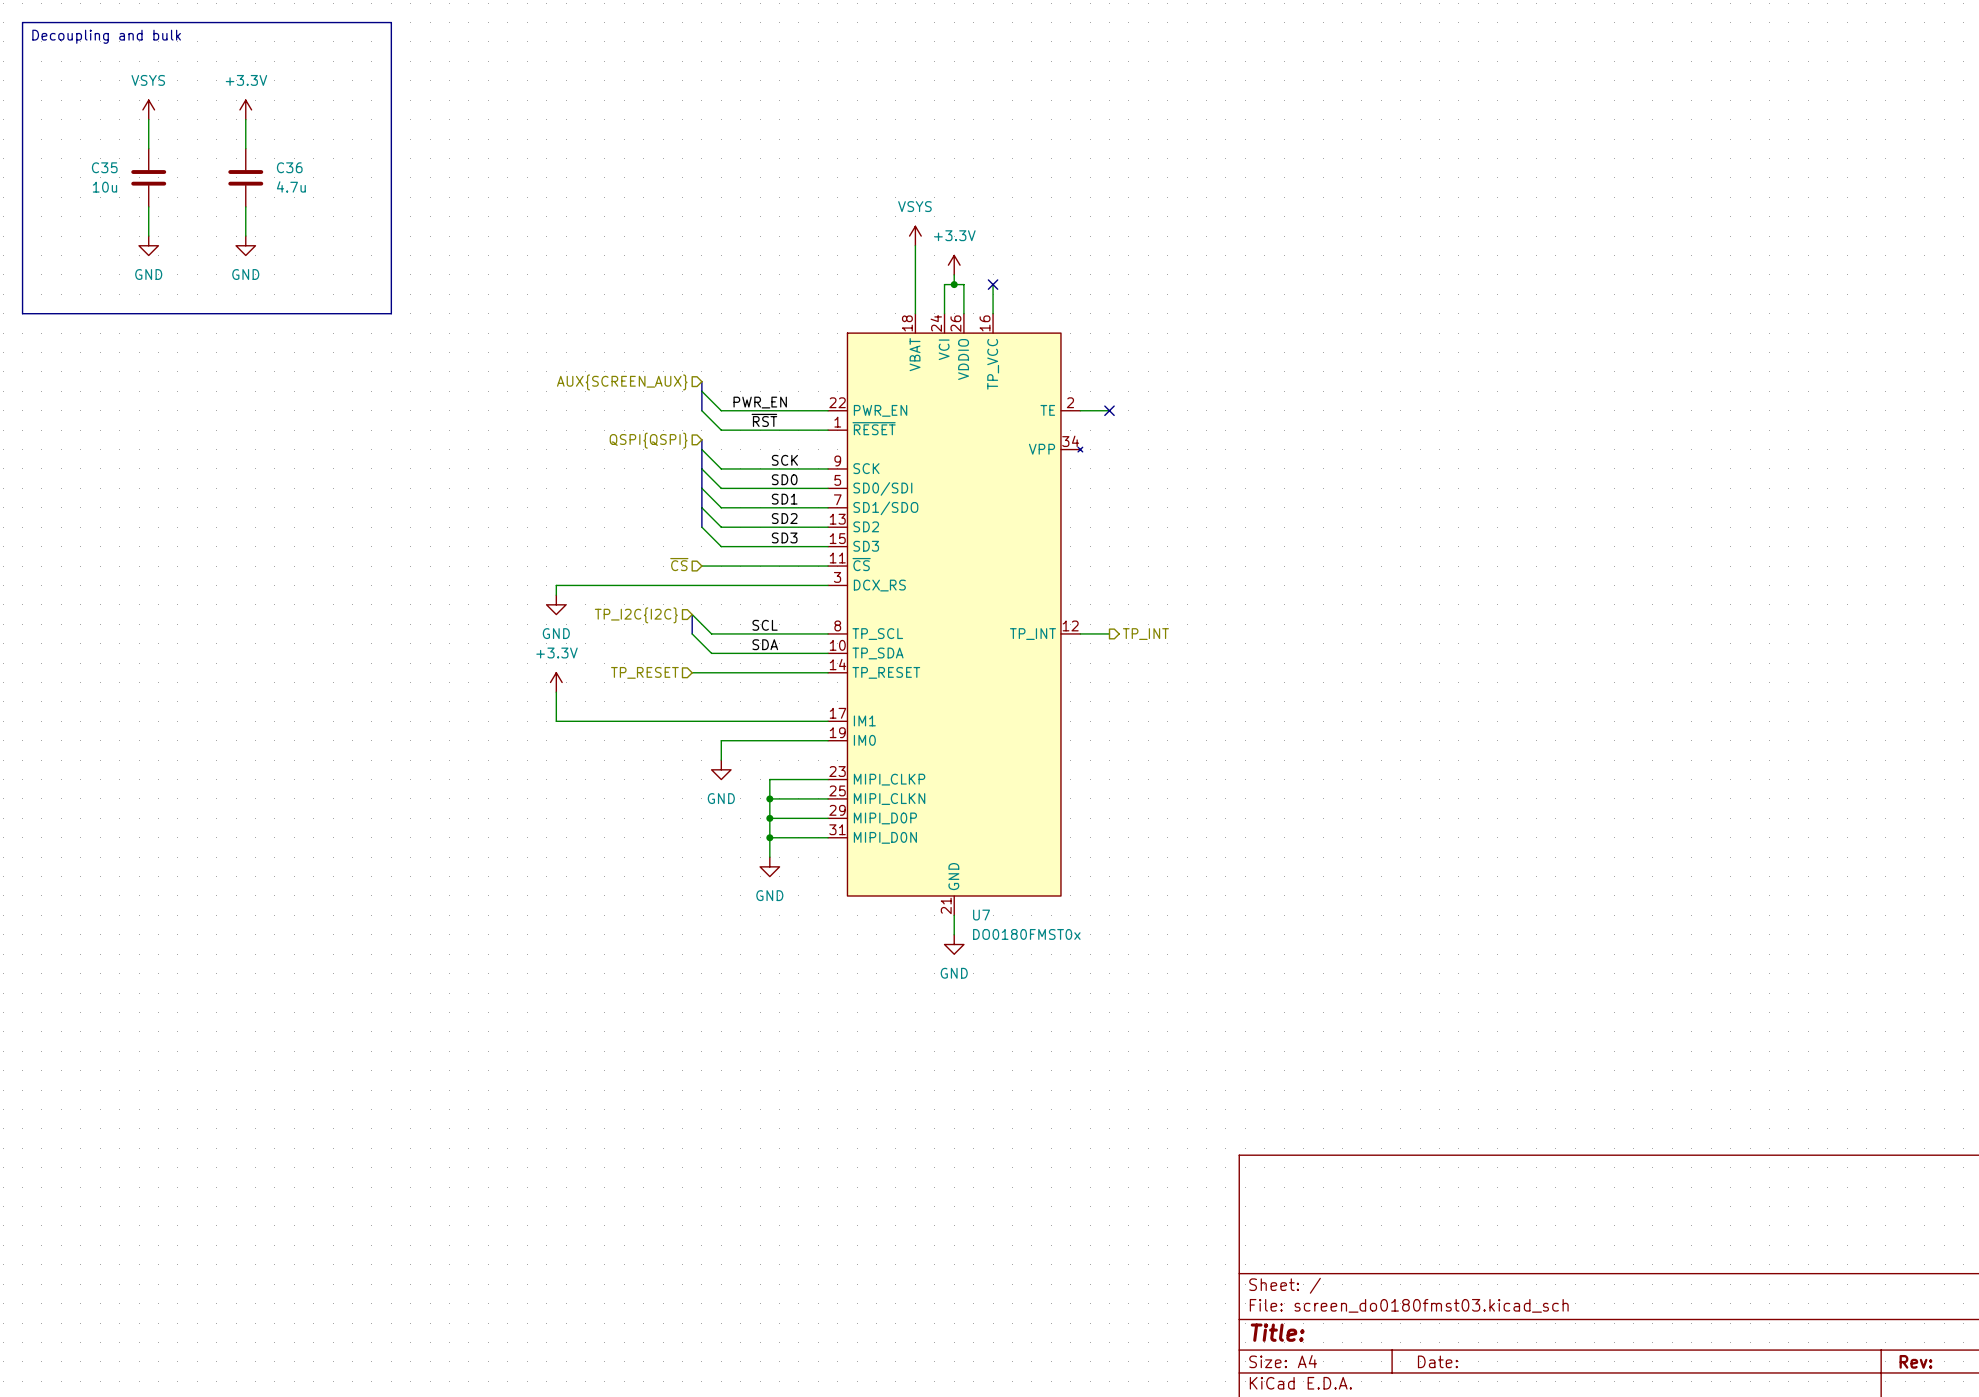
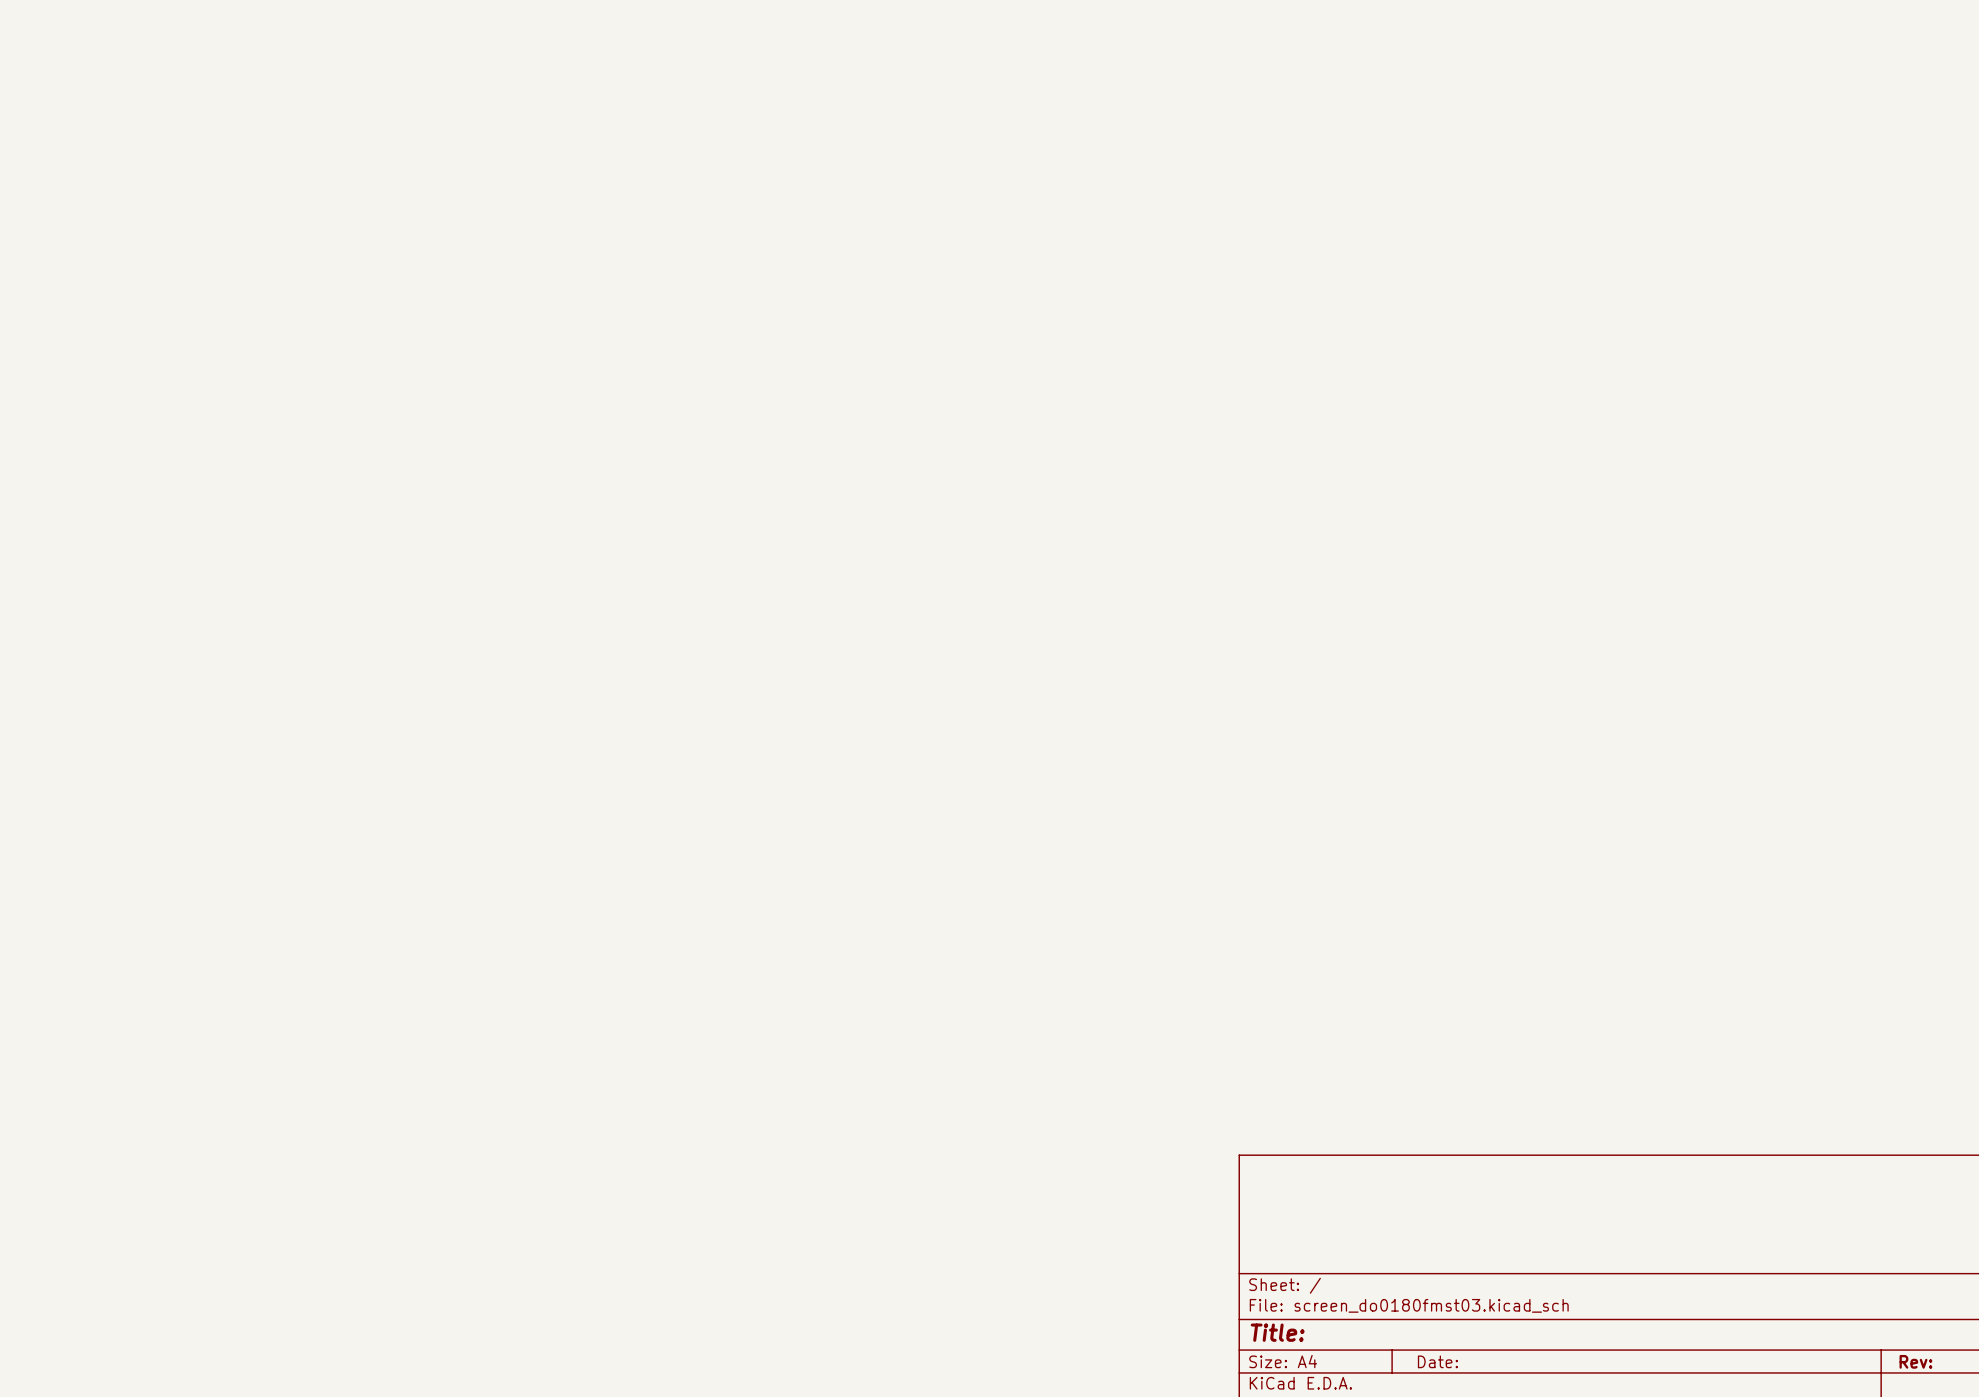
line: (22, 22) (391, 22) (391, 313) (22, 313) (22, 22) -> none
text: Decoupling and bulk (106, 36) -> none
power symbol: VSYS (148, 109) -> none
power symbol: +3.3V (245, 109) -> none
wire: (148, 119) (148, 148) -> none
wire: (245, 119) (245, 148) -> none
C35: 10u (148, 177) -> none
C36: 4.7u (245, 177) -> none
wire: (148, 206) (148, 236) -> none
wire: (245, 206) (245, 236) -> none
power symbol: VSYS (915, 236) -> none
power symbol: GND (148, 245) -> none
power symbol: GND (245, 245) -> none
wire: (915, 245) (915, 313) -> none
power symbol: +3.3V (954, 265) -> none
wire: (954, 274) (954, 284) -> none
junction: (954, 284) -> none
wire: (993, 284) (993, 313) -> none
no-connect mark: (993, 284) -> none
wire: (944, 313) (944, 284) (963, 284) (963, 313) -> none
bus: (701, 381) (701, 410) -> none
hierarchical label: AUX{SCREEN_AUX} (622, 382) -> none
wire: (701, 391) (721, 410) (828, 410) -> none
label: PWR_EN (760, 402) -> none
wire: (701, 410) (721, 430) (828, 430) -> none
wire: (1080, 410) (1109, 410) -> none
no-connect mark: (1109, 410) -> none
label: ~{RST} (764, 420) -> none
bus: (701, 439) (701, 527) -> none
hierarchical label: QSPI{QSPI} (648, 440) -> none
wire: (701, 449) (721, 468) (828, 468) -> none
label: SCK (784, 460) -> none
wire: (701, 468) (721, 488) (828, 488) -> none
label: SD0 (784, 479) -> none
wire: (701, 488) (721, 507) (828, 507) -> none
label: SD1 (784, 499) -> none
wire: (701, 507) (721, 527) (828, 527) -> none
label: SD2 (784, 518) -> none
wire: (701, 527) (721, 546) (828, 546) -> none
label: SD3 (784, 537) -> none
hierarchical label: ~{CS} (679, 564) -> none
wire: (701, 566) (828, 566) -> none
wire: (828, 585) (556, 585) (556, 595) -> none
power symbol: GND (556, 604) -> none
wire: (692, 614) (711, 633) (828, 633) -> none
bus: (692, 614) (692, 633) -> none
U7: DO0180FMST0x (955, 614) -> none
hierarchical label: TP_I2C{I2C} (636, 615) -> none
label: SCL (765, 625) -> none
wire: (692, 633) (711, 653) (828, 653) -> none
wire: (1080, 633) (1109, 633) -> none
hierarchical label: TP_INT (1145, 634) -> none
label: SDA (765, 644) -> none
hierarchical label: TP_RESET (644, 672) -> none
wire: (692, 672) (828, 672) -> none
power symbol: +3.3V (556, 682) -> none
wire: (556, 692) (556, 721) (828, 721) -> none
wire: (828, 740) (721, 740) (721, 760) -> none
power symbol: GND (721, 769) -> none
wire: (828, 779) (769, 779) (769, 857) -> none
wire: (769, 798) (828, 798) -> none
junction: (769, 798) -> none
wire: (769, 818) (828, 818) -> none
junction: (769, 818) -> none
wire: (769, 837) (828, 837) -> none
junction: (769, 837) -> none
power symbol: GND (769, 866) -> none
wire: (954, 915) (954, 934) -> none
power symbol: GND (954, 944) -> none

